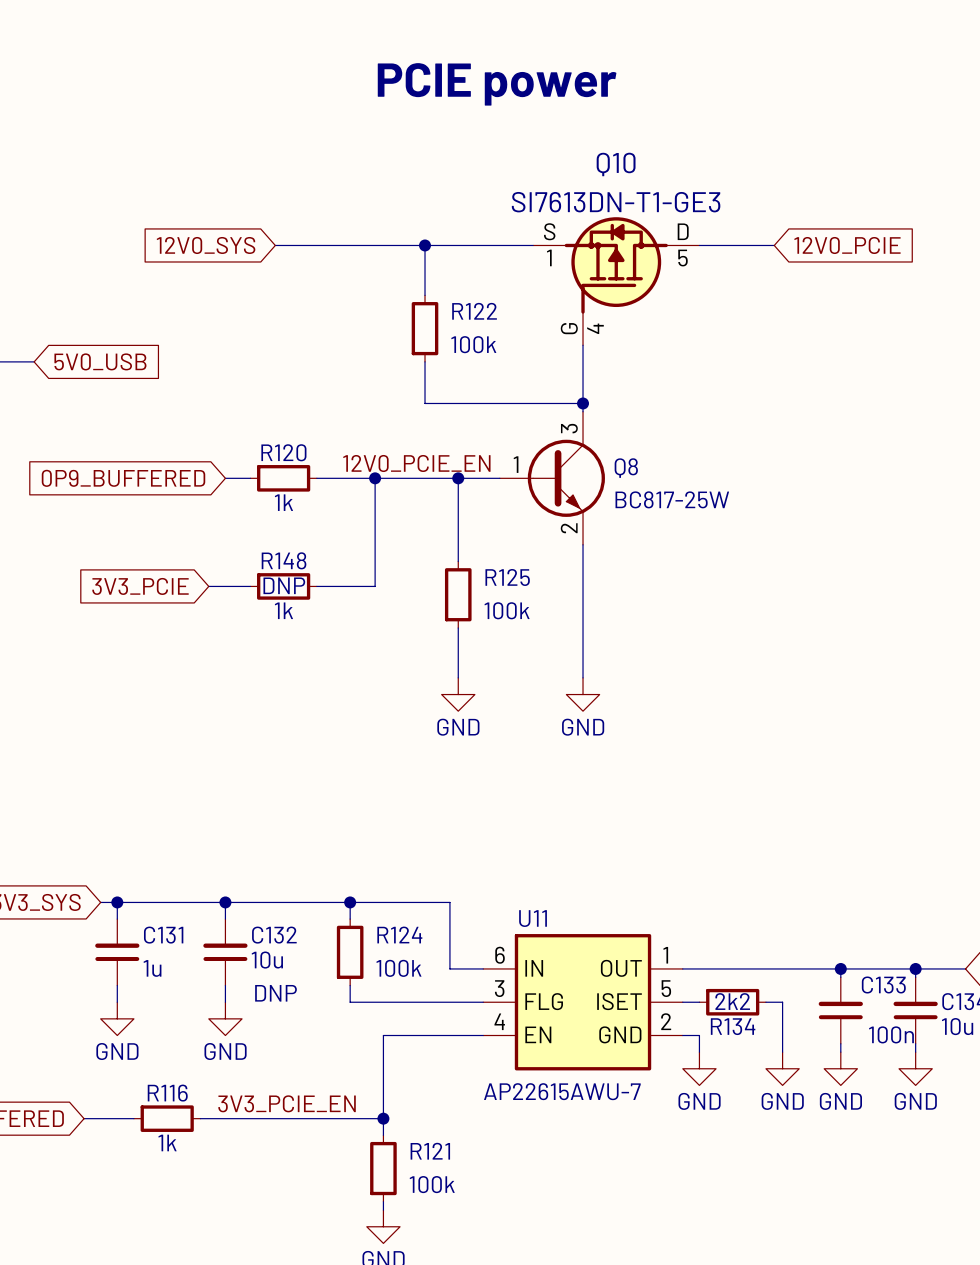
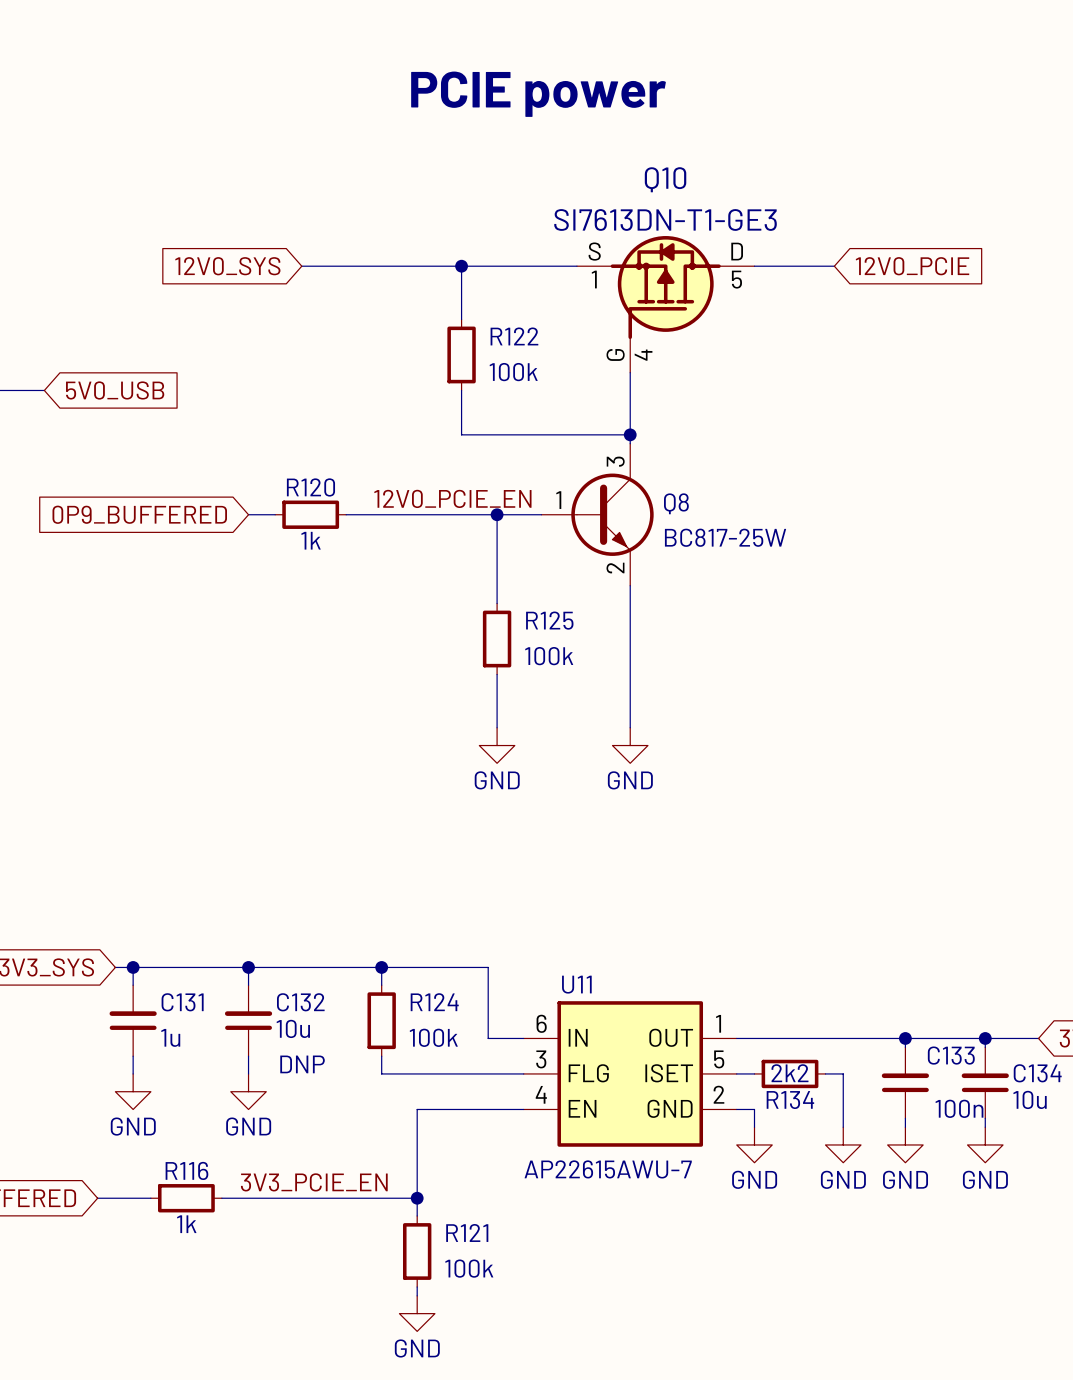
wire: (375, 478) (375, 586) (316, 586) -> none
junction: (375, 478) -> none
global label: 3V3_PCIE (140, 586) -> none
wire: (208, 586) (250, 586) -> none
R148: (283, 586) -> none

